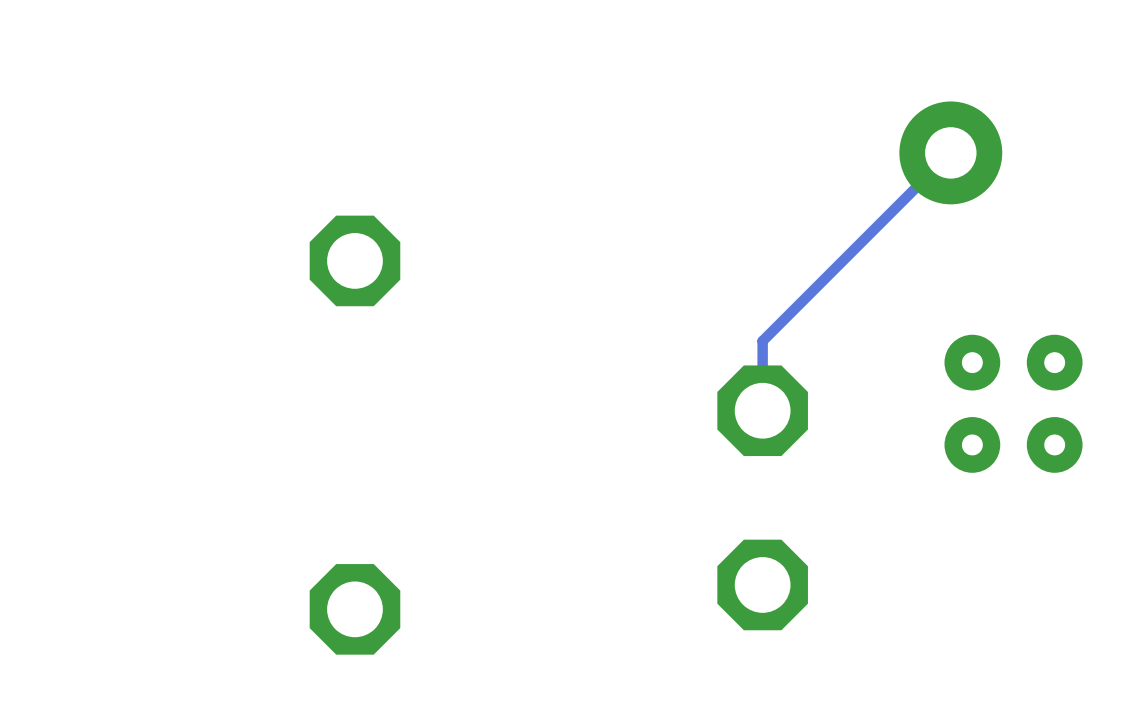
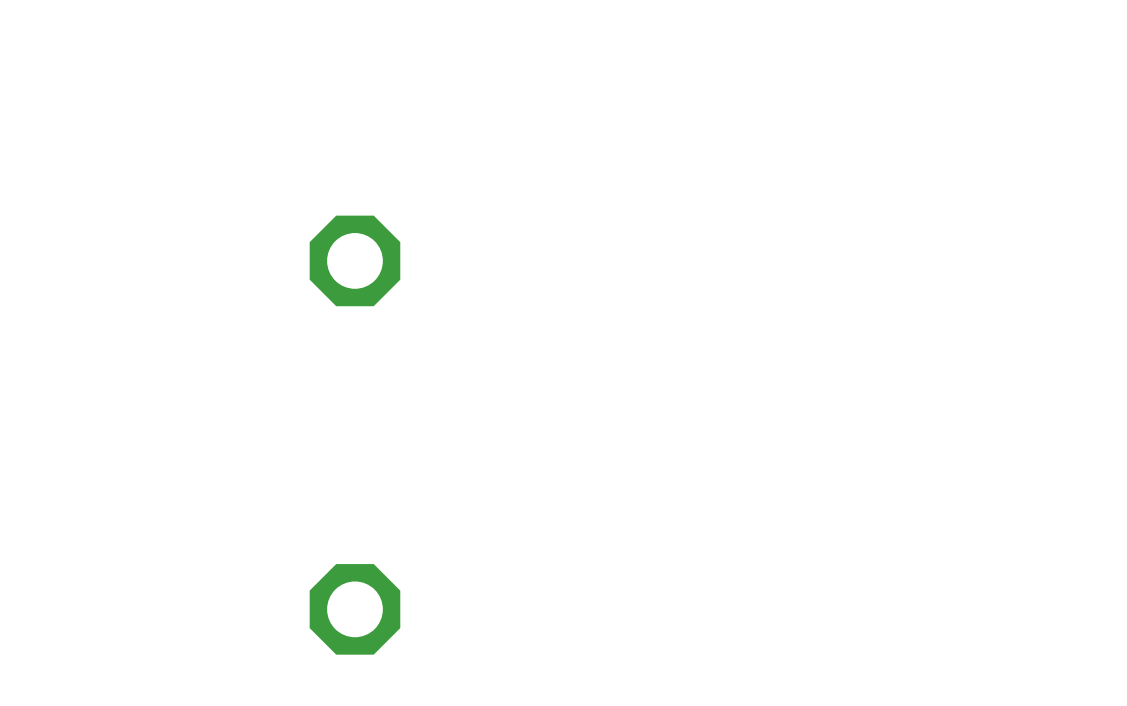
track: (950, 152) (762, 341) (762, 410) -> none
via: (950, 152) -> none
part: (1013, 403) -> none
part: (762, 497) -> none

